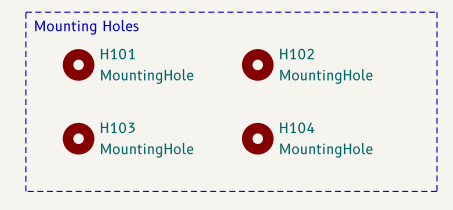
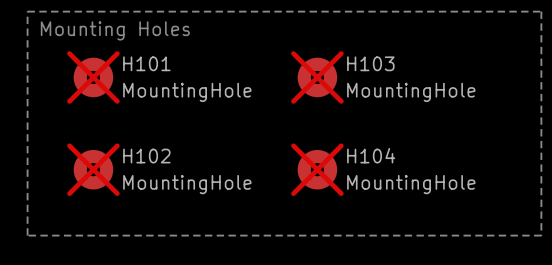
H102 name: H102 (296, 54) -> H103 (370, 63)
H101 do-not-place cross: none -> (93, 77)
H102 do-not-place cross: none -> (317, 77)
H103 name: H103 (117, 127) -> H102 (146, 156)
H103 do-not-place cross: none -> (93, 169)
H104 do-not-place cross: none -> (317, 169)

